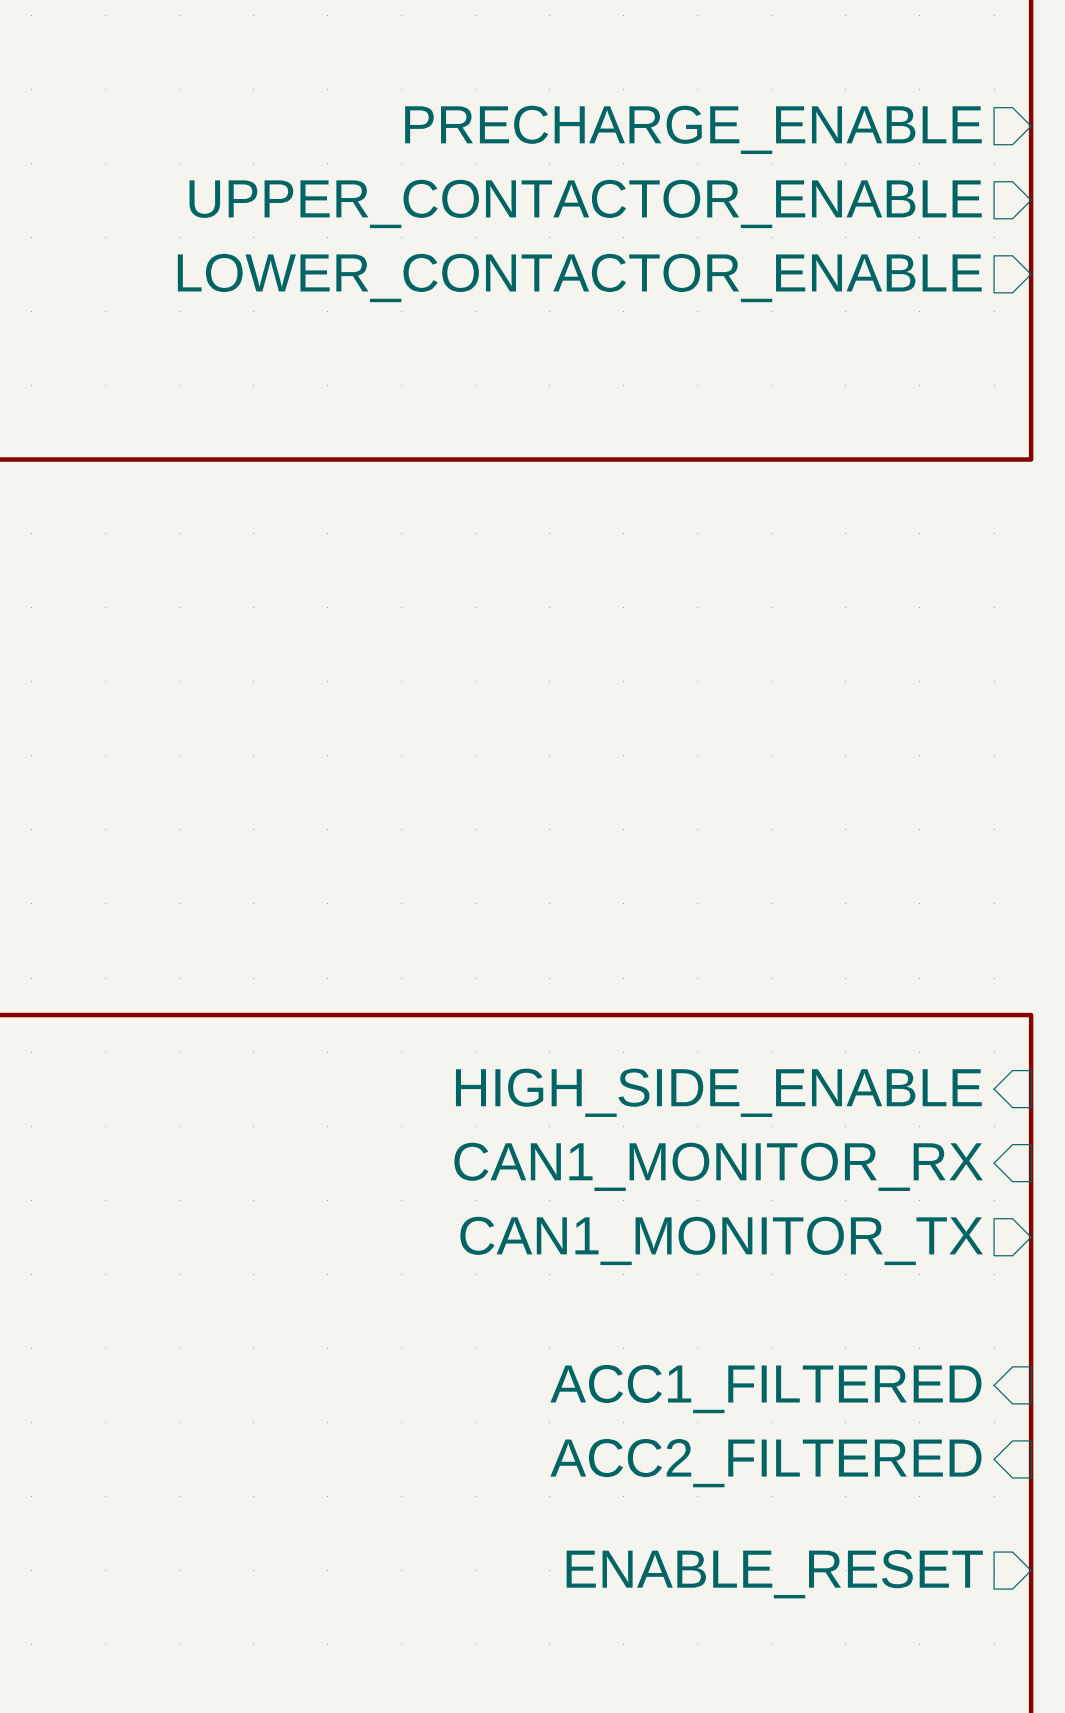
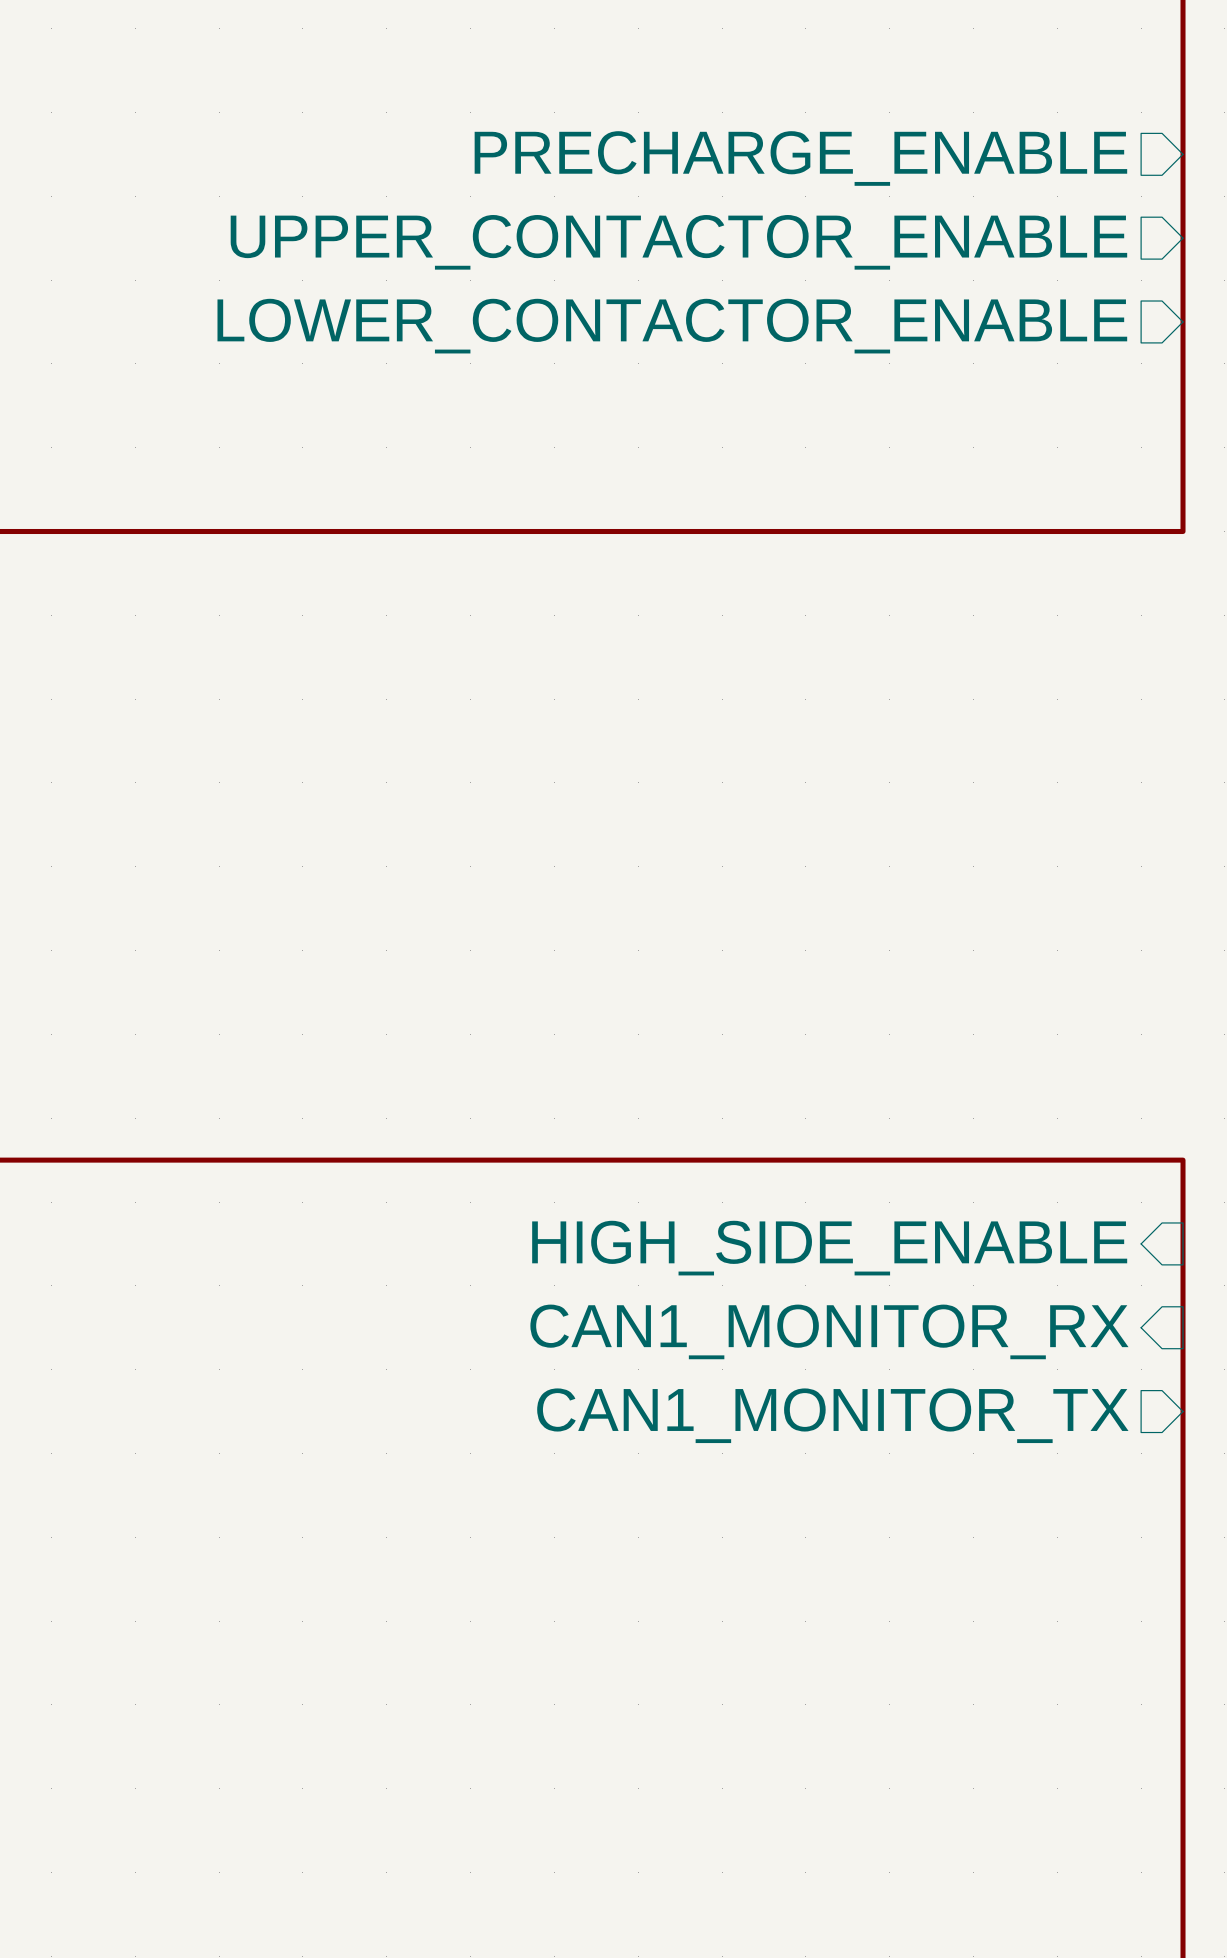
sheet pin: ACC1_FILTERED (765, 1389) -> none
sheet pin: ACC2_FILTERED (765, 1463) -> none
sheet pin: ENABLE_RESET (774, 1574) -> none

